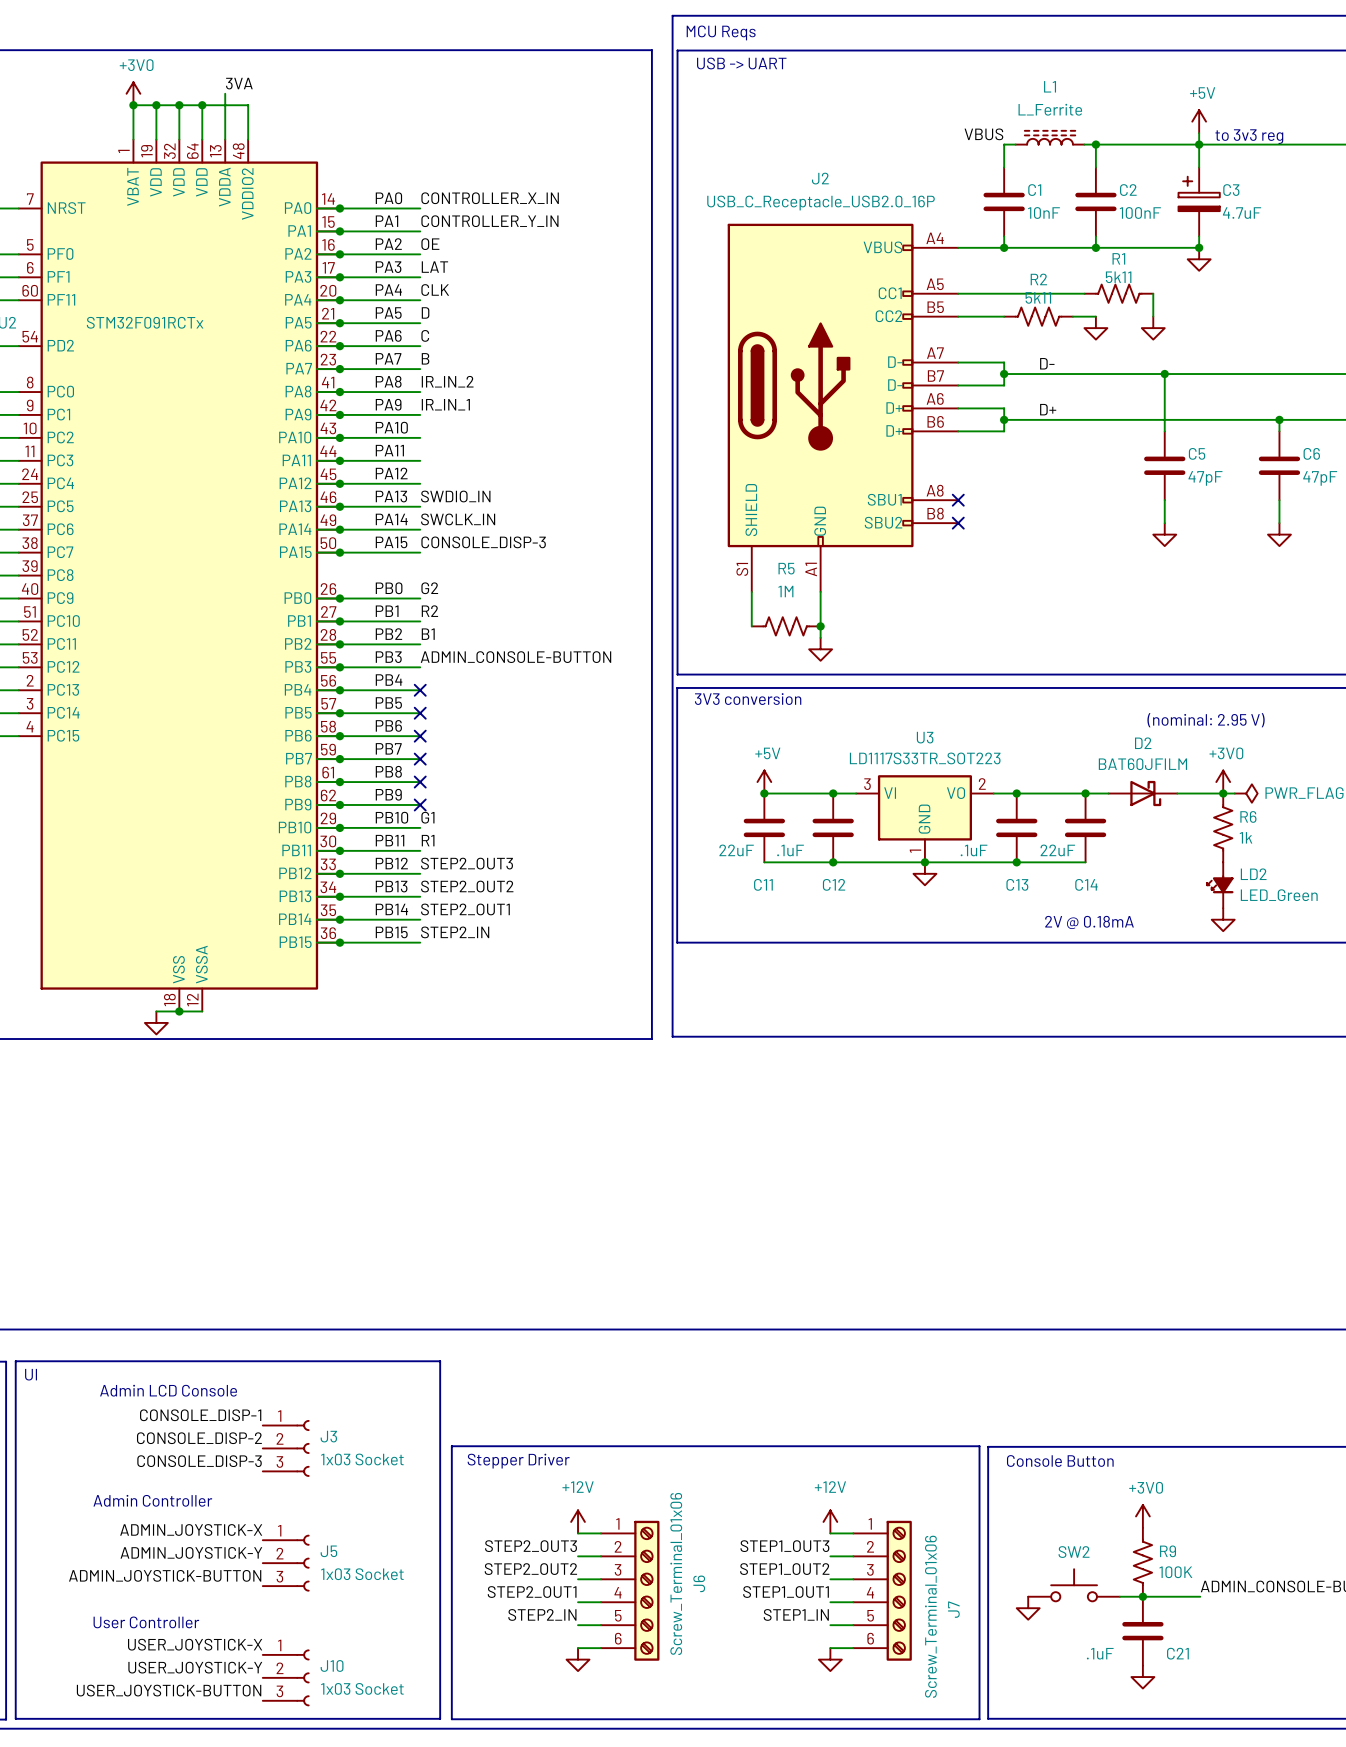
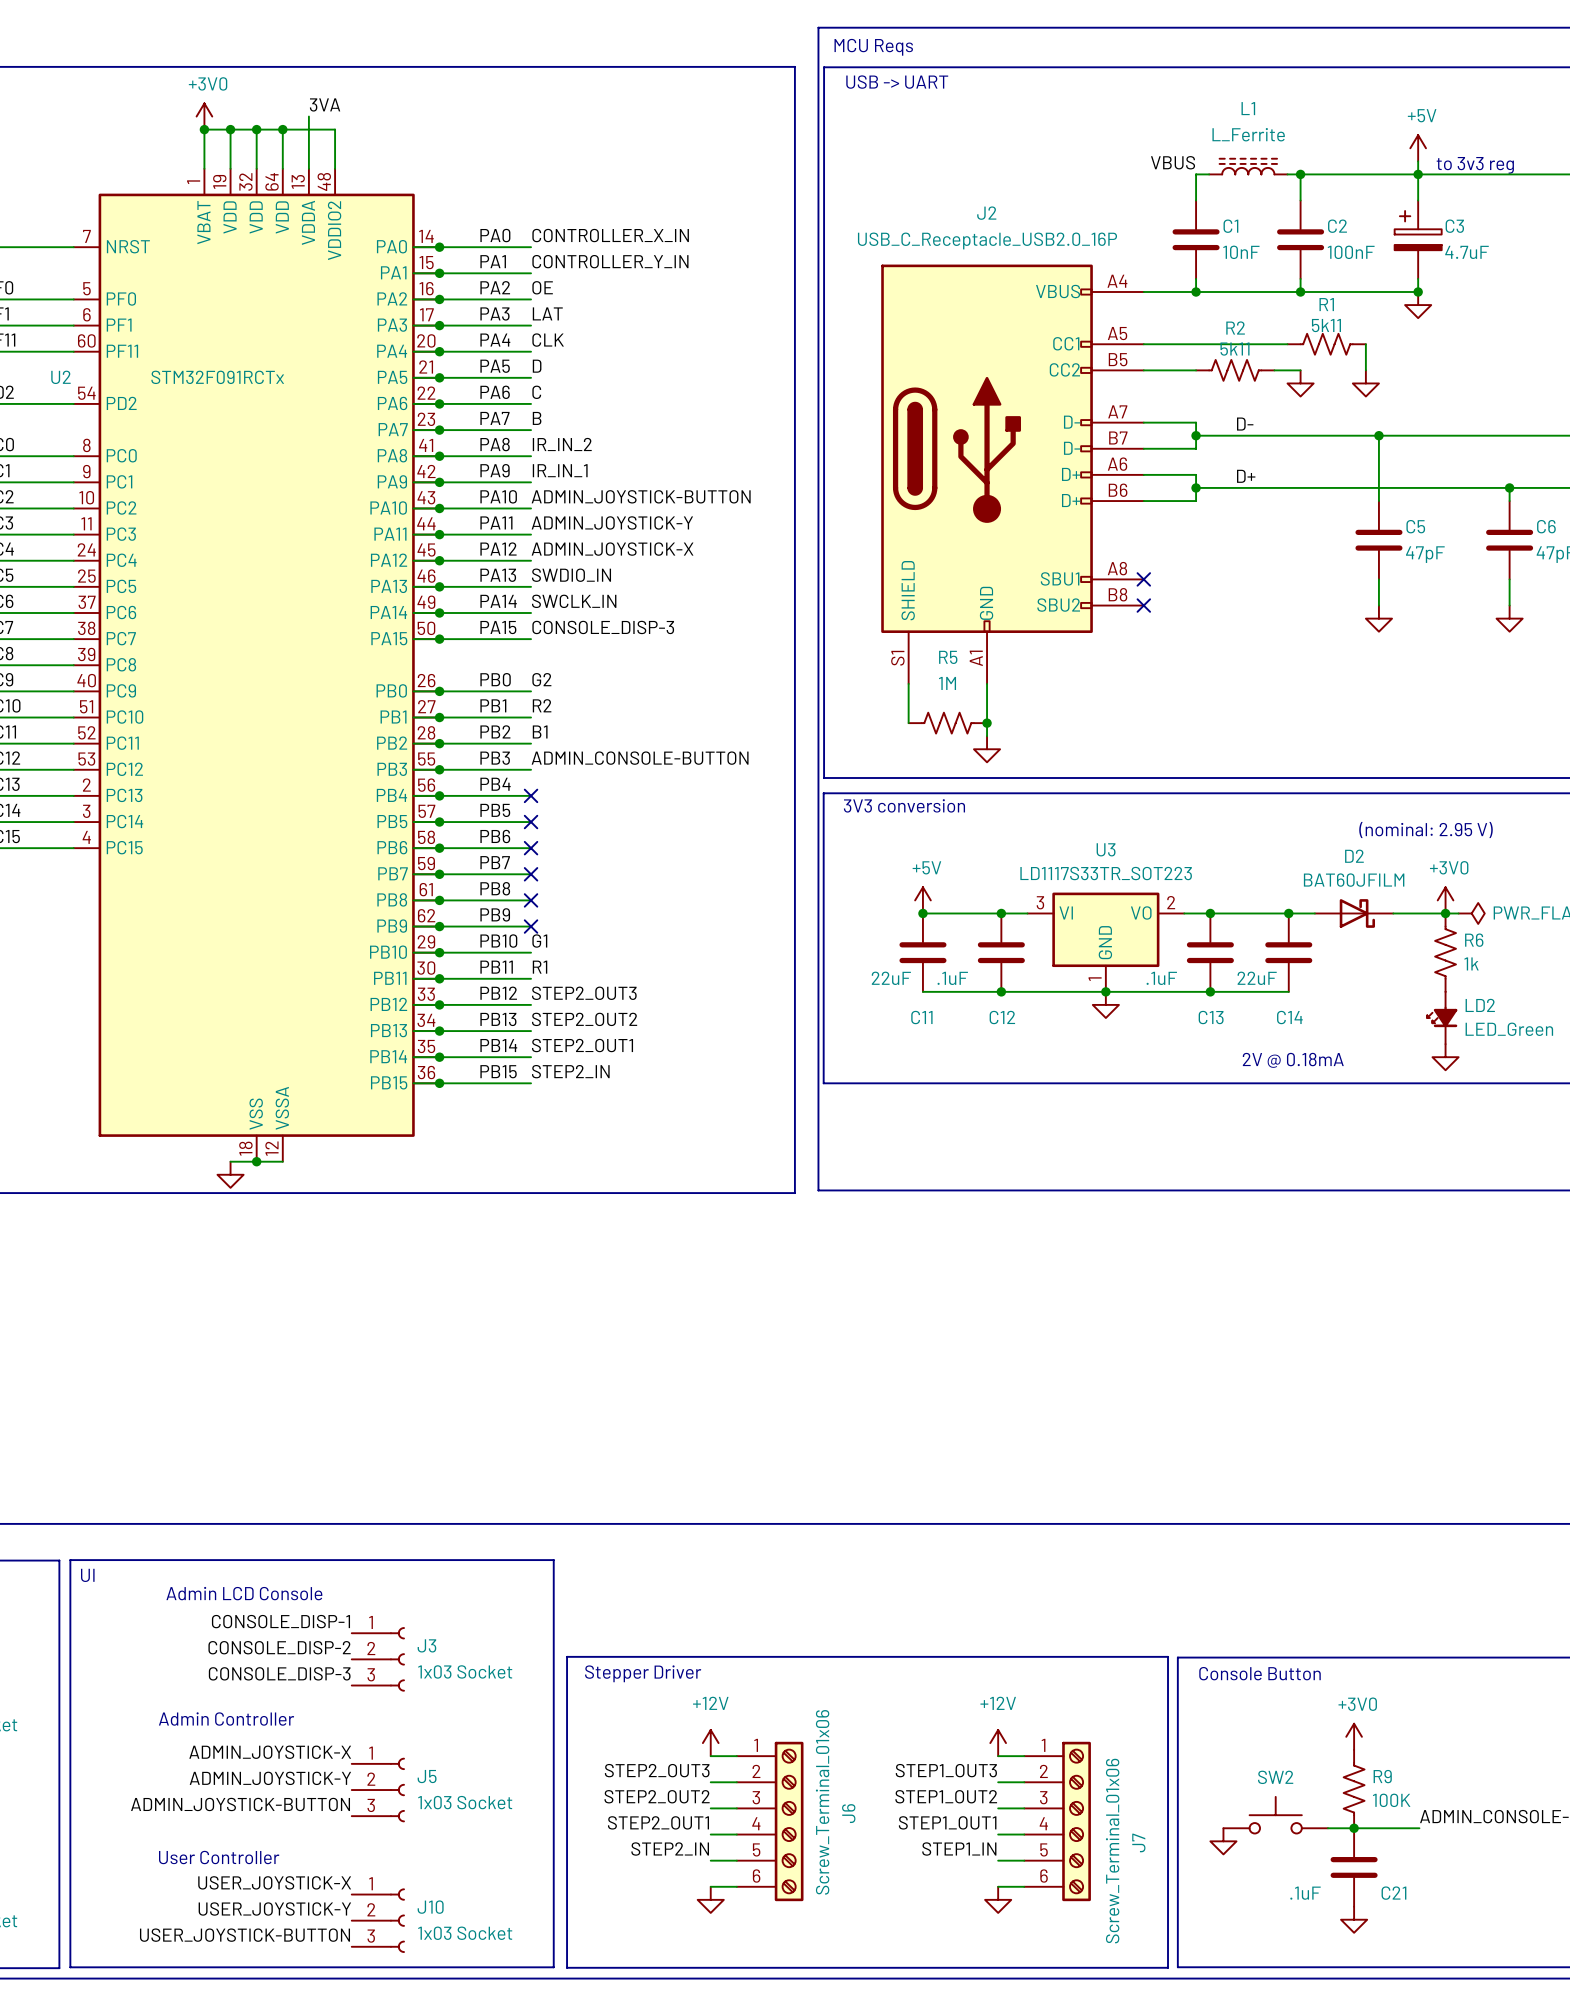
label: none -> ADMIN_JOYSTICK-BUTTON (641, 496)
label: none -> ADMIN_JOYSTICK-Y (612, 522)
label: none -> ADMIN_JOYSTICK-X (612, 549)

